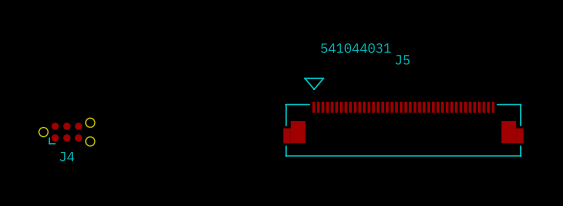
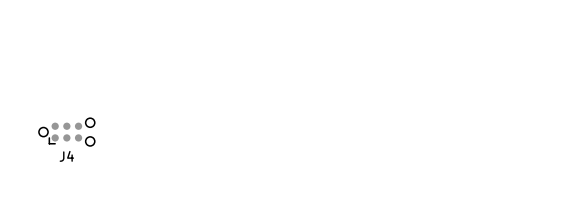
J5: (403, 117) -> none

